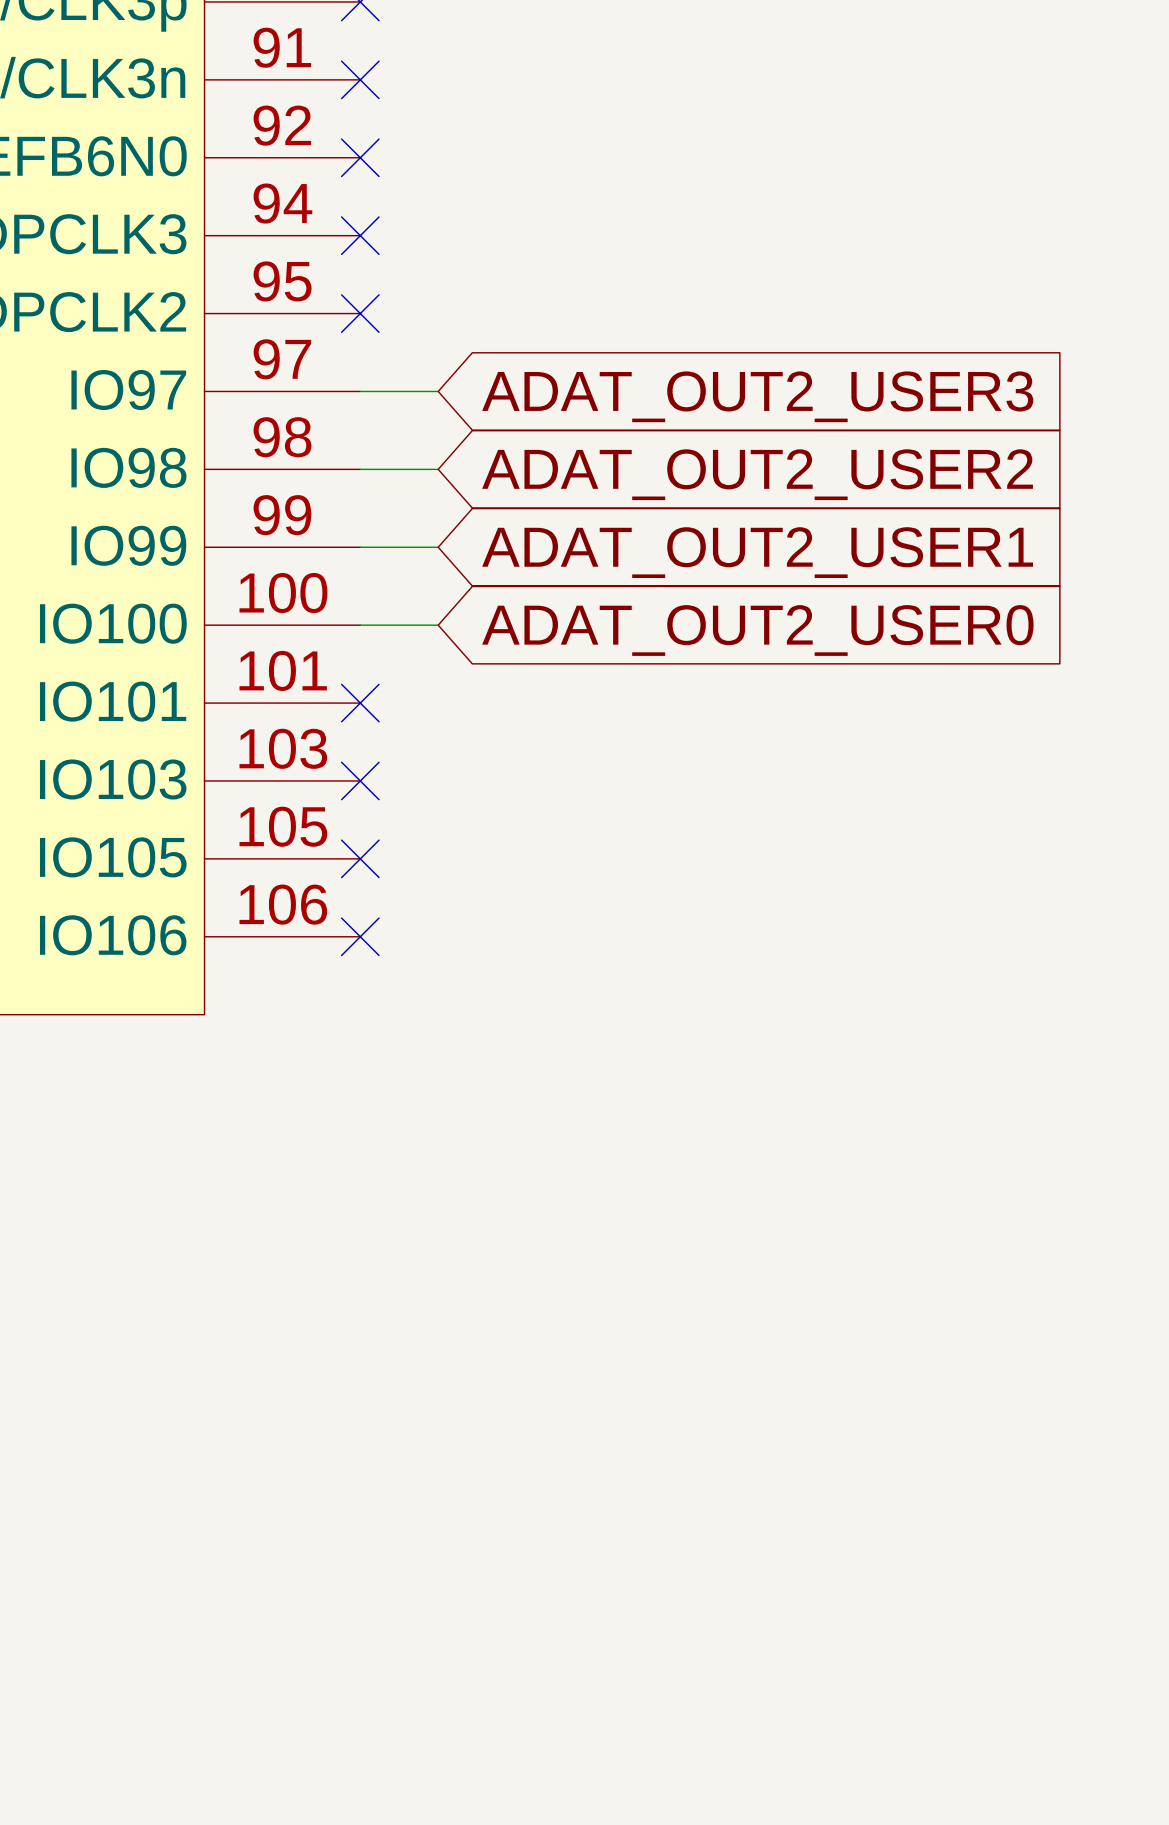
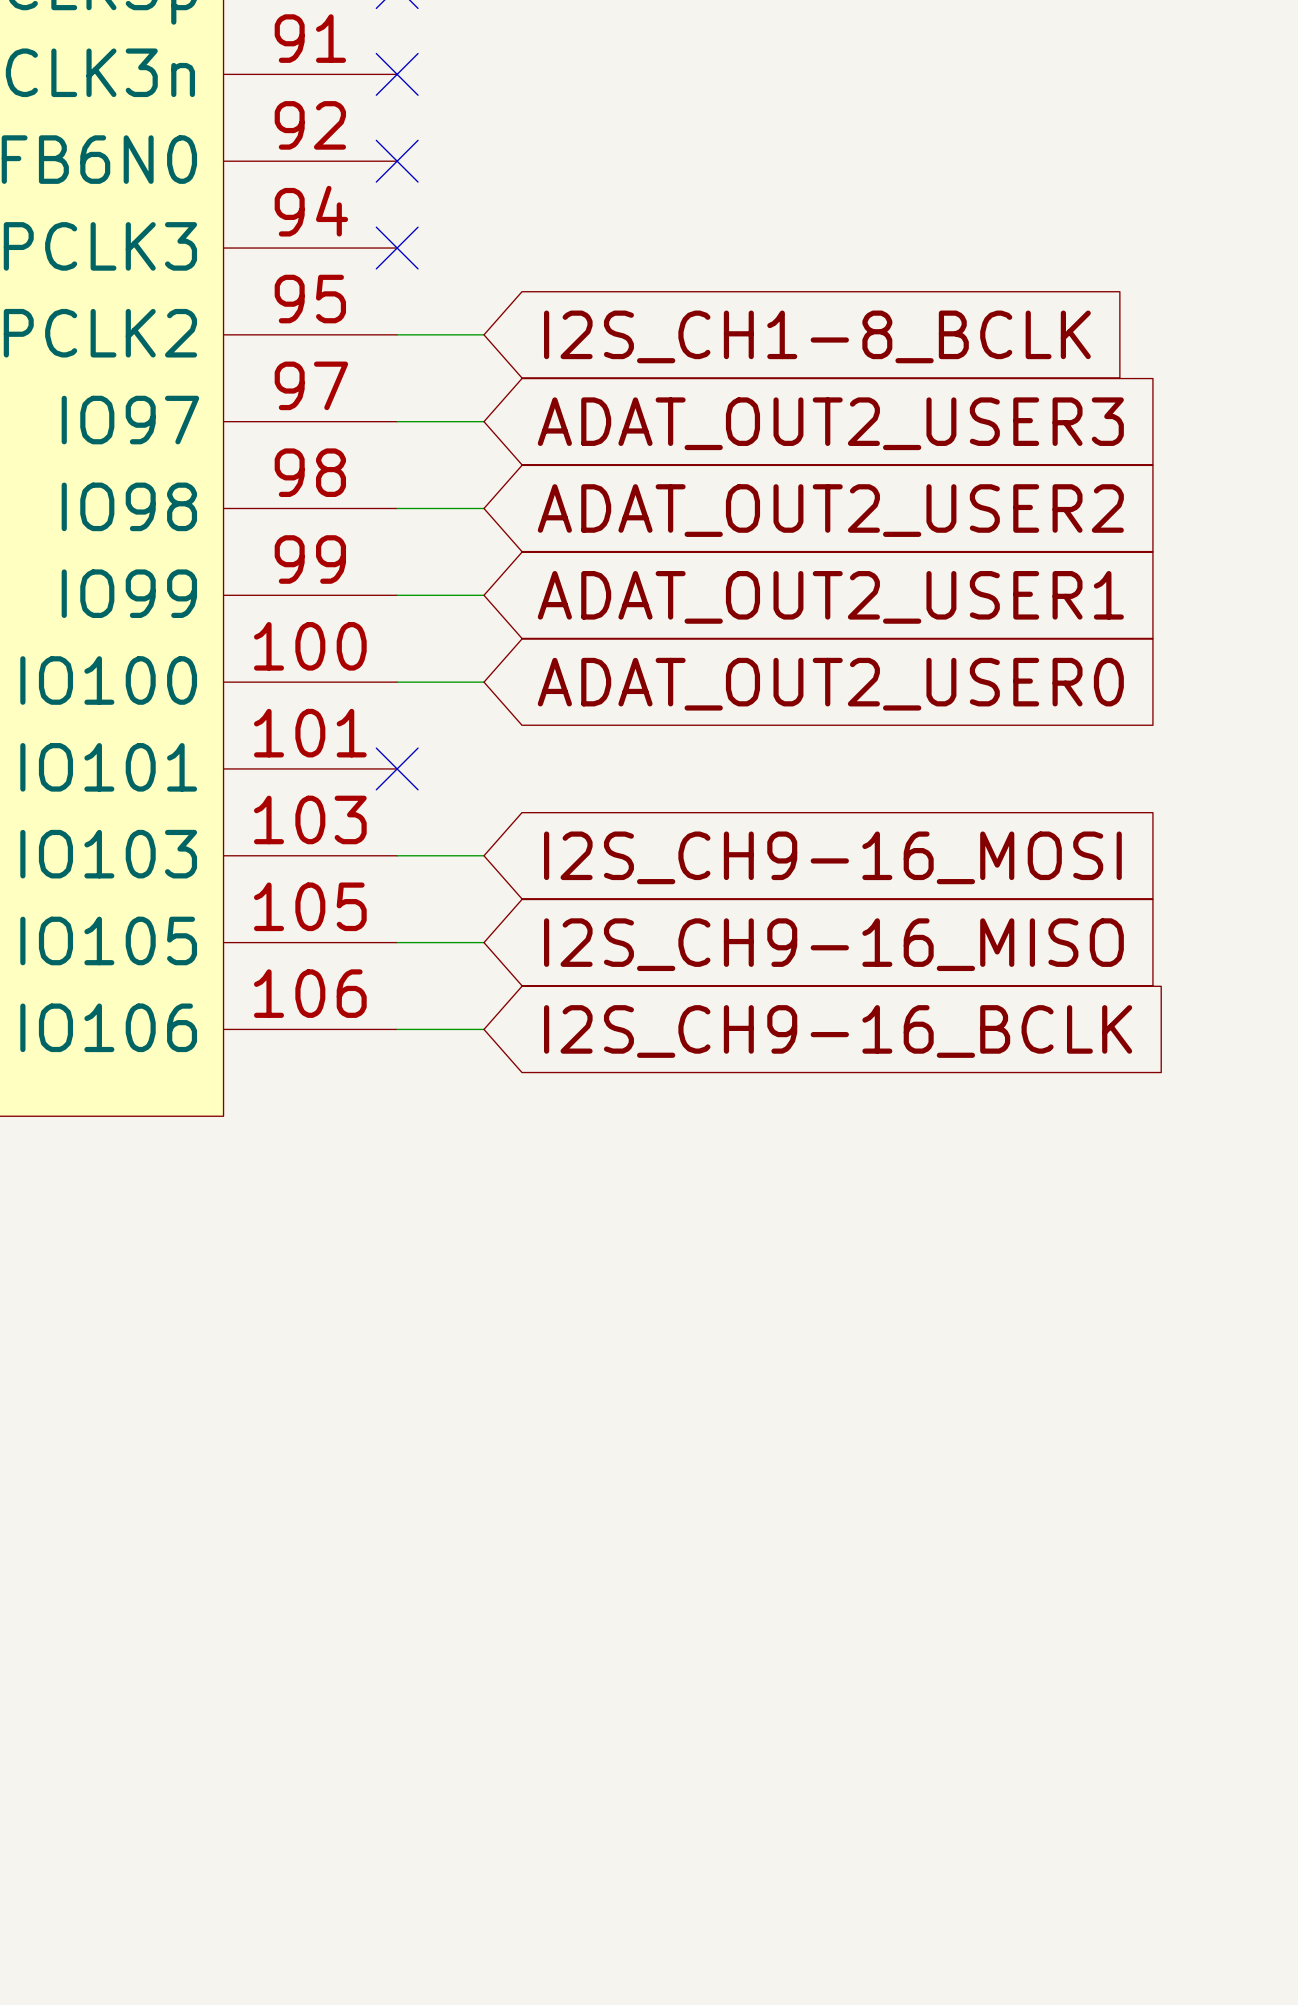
wire: none -> (397, 334) (483, 334)
no-connect mark: (360, 313) -> none
global label: none -> I2S_CH1-8_BCLK (817, 336)
wire: none -> (397, 855) (483, 855)
no-connect mark: (360, 780) -> none
global label: none -> I2S_CH9-16_MOSI (832, 857)
wire: none -> (397, 942) (483, 942)
no-connect mark: (360, 858) -> none
global label: none -> I2S_CH9-16_MISO (833, 944)
wire: none -> (397, 1029) (483, 1029)
no-connect mark: (360, 936) -> none
global label: none -> I2S_CH9-16_BCLK (838, 1031)

